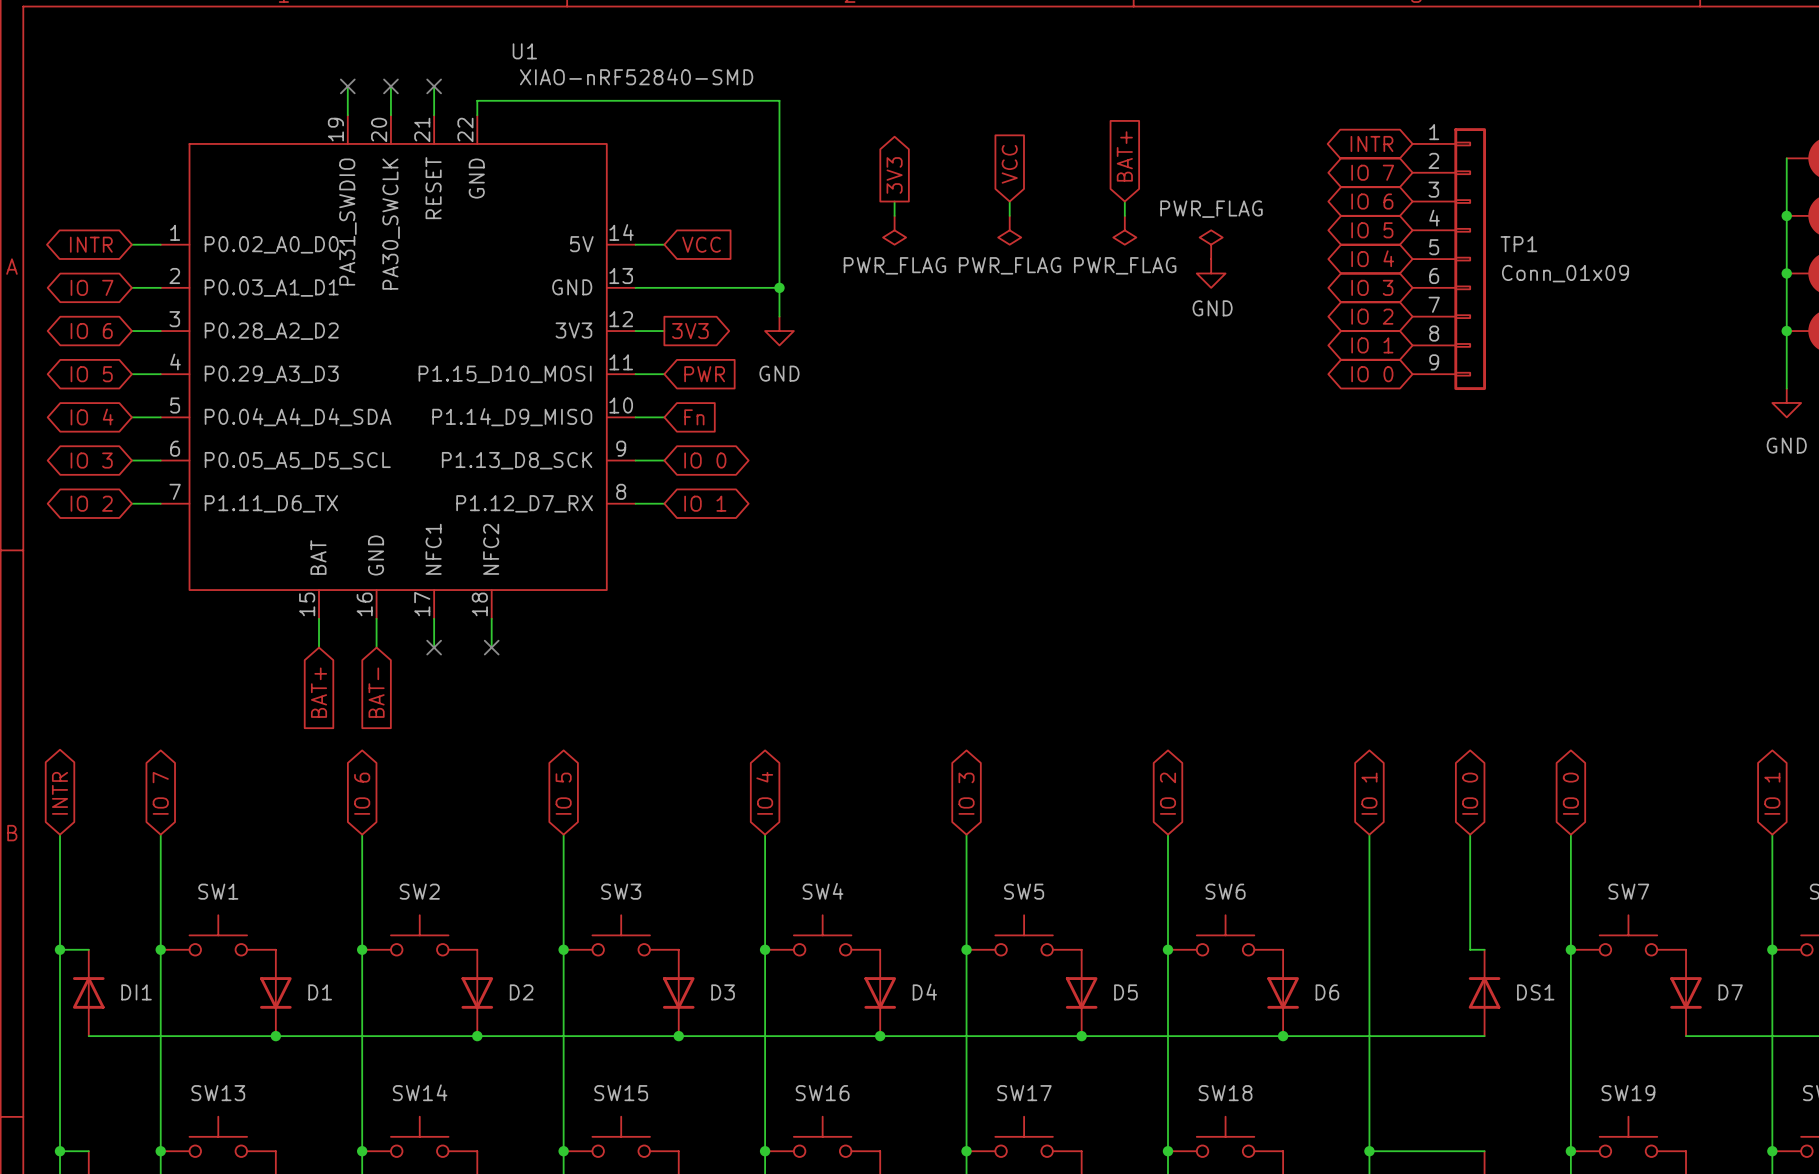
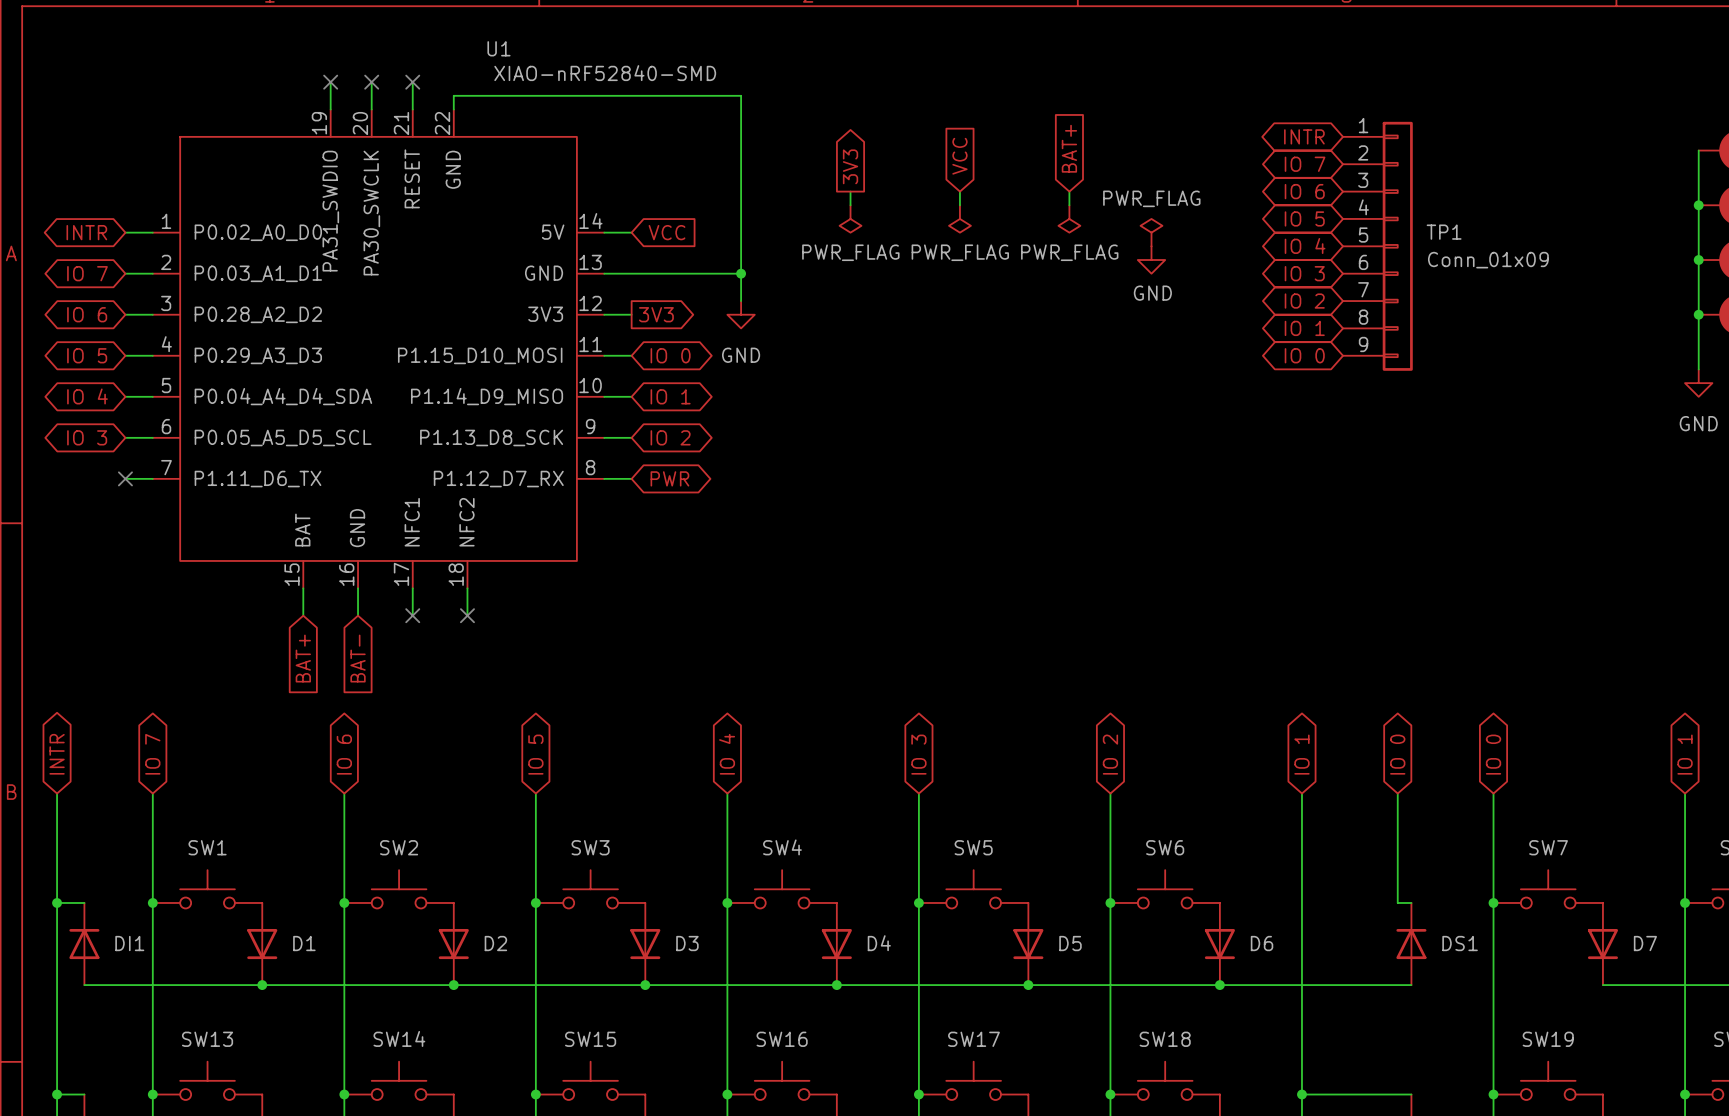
global label shape: input (704, 374) -> bidirectional (670, 355)
global label: PWR (704, 374) -> IO 0 (670, 355)
global label shape: input (694, 417) -> bidirectional (670, 396)
global label: Fn (694, 417) -> IO 1 (670, 396)
global label: IO 0 (705, 460) -> IO 2 (670, 437)
global label: IO 2 (91, 503) -> none
no-connect mark: none -> (125, 478)
global label: IO 1 (705, 503) -> PWR (669, 478)

